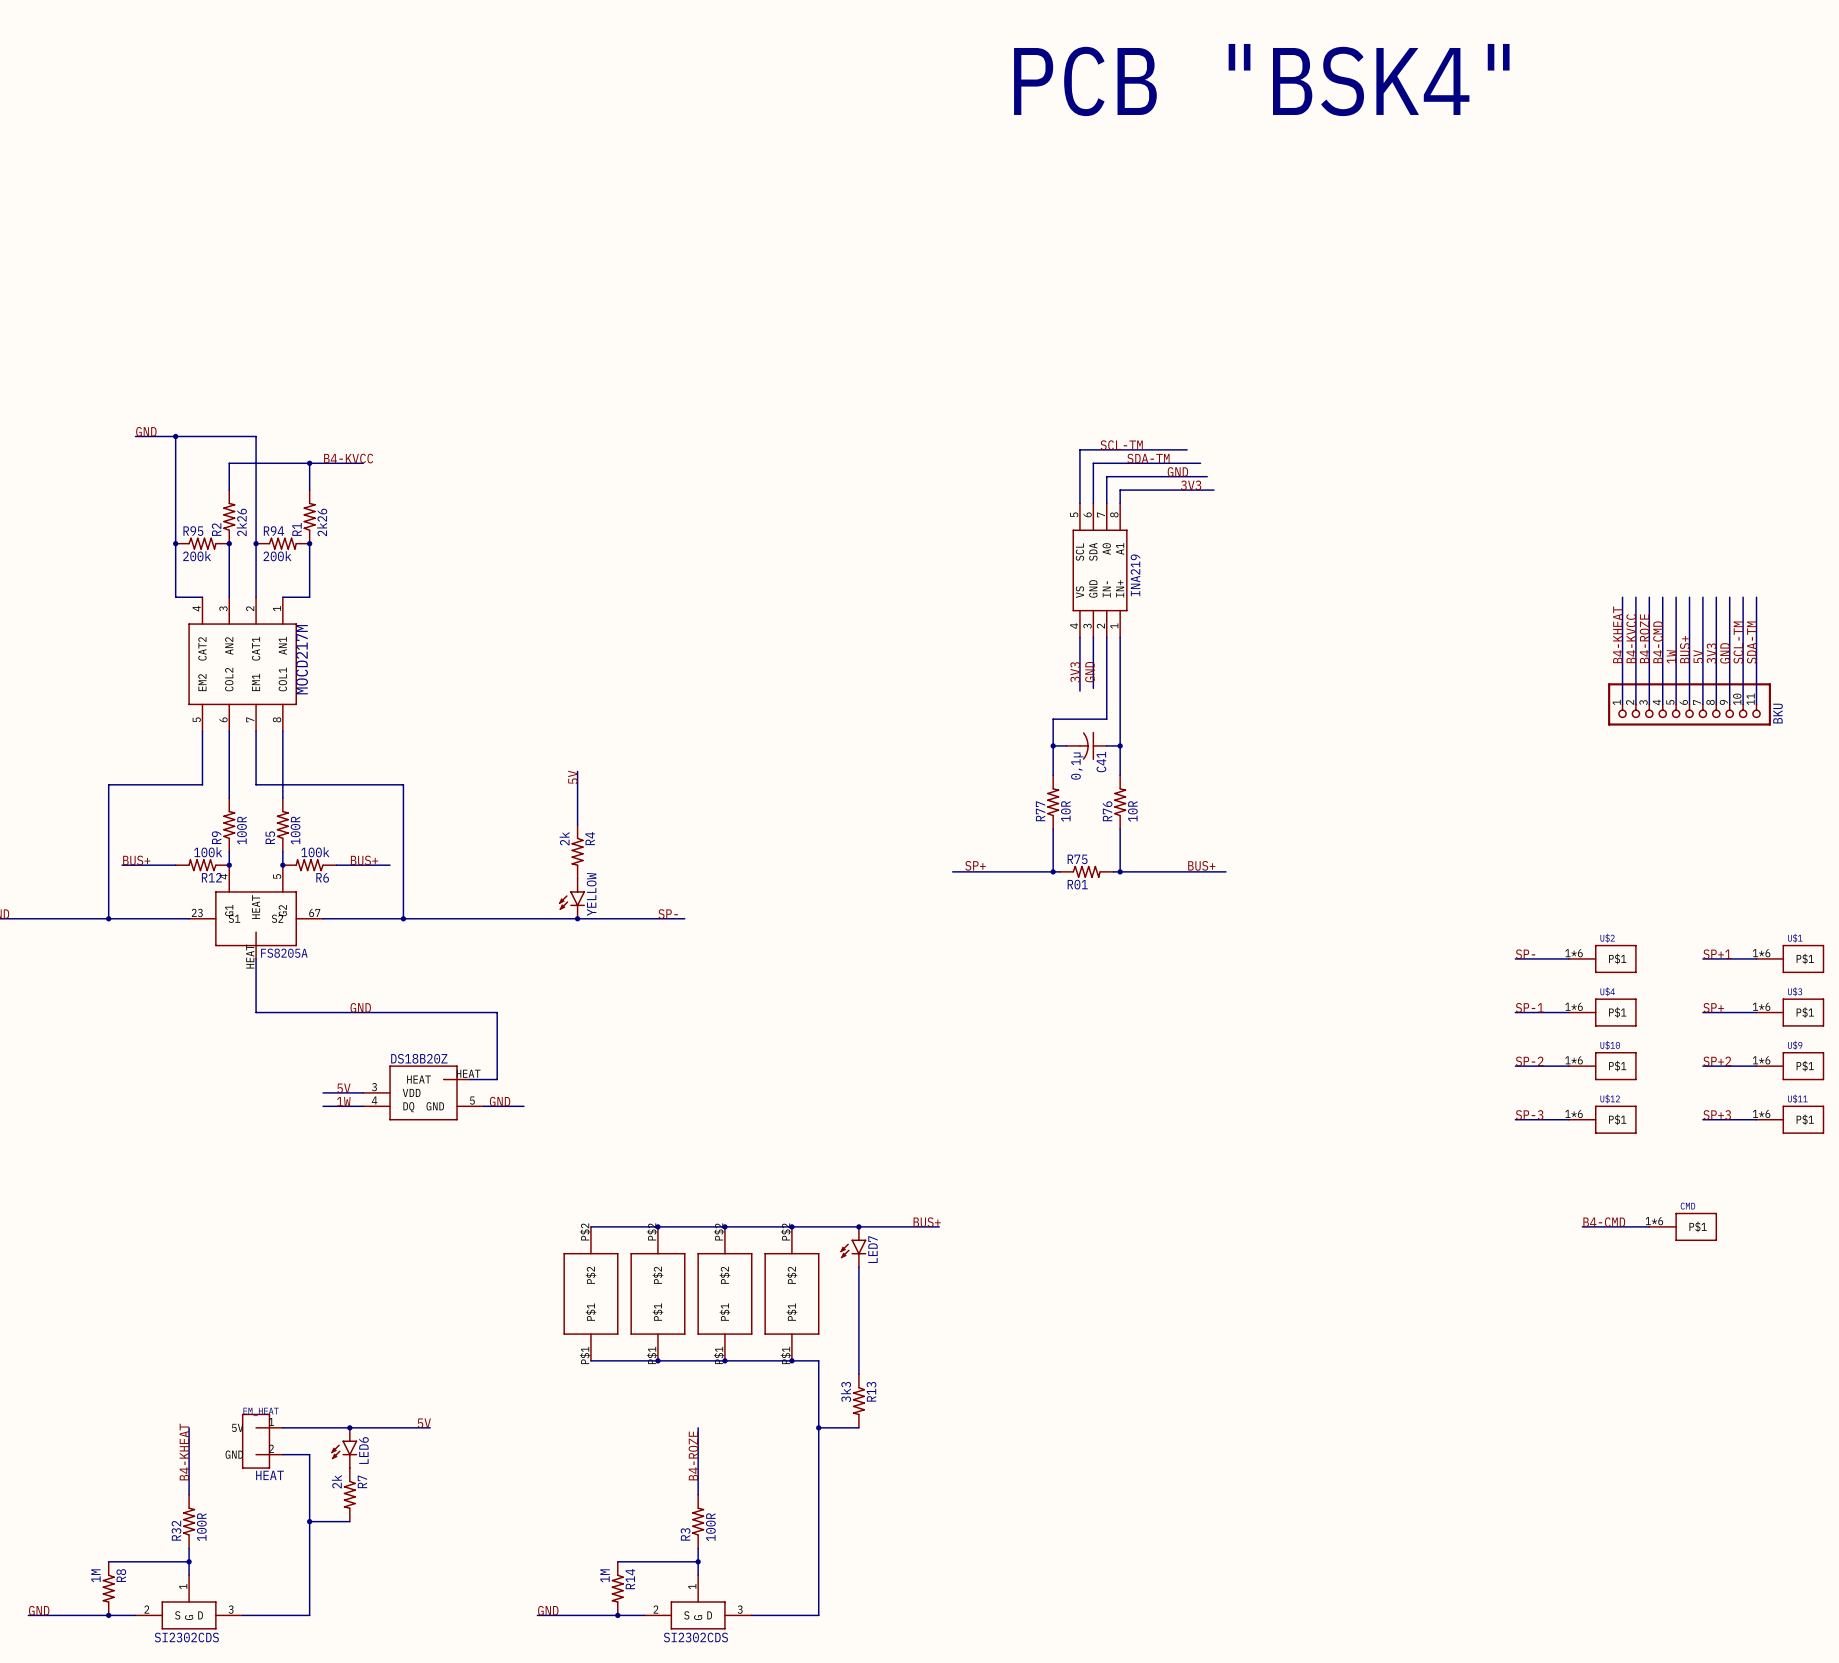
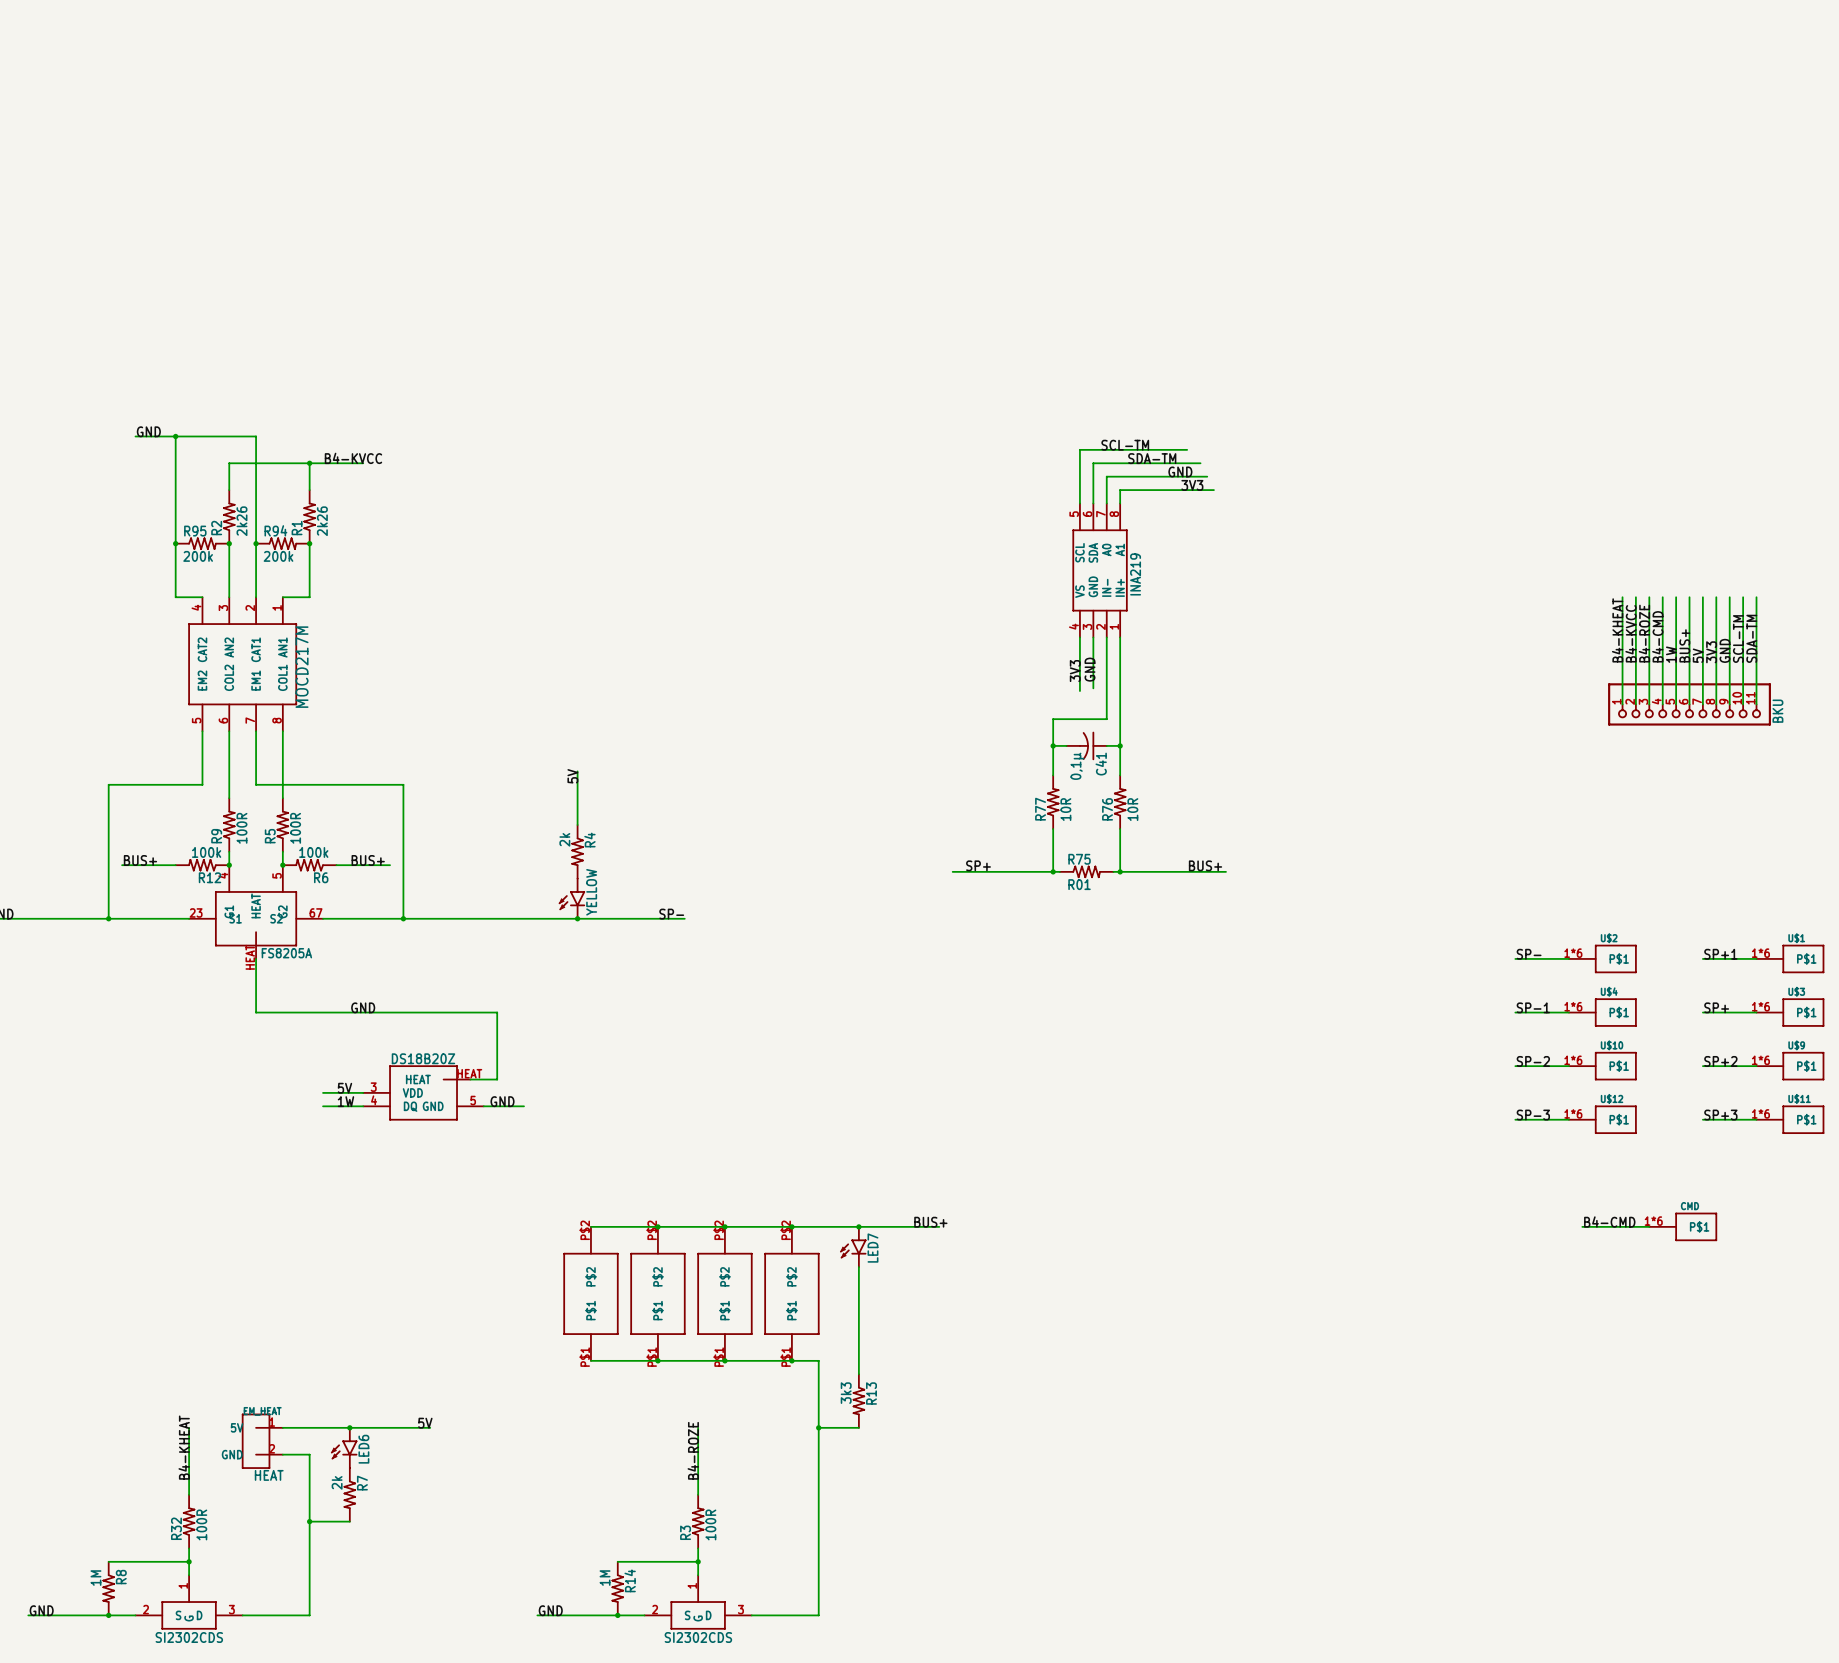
part: PCB "BSK4" (1261, 80) -> none

